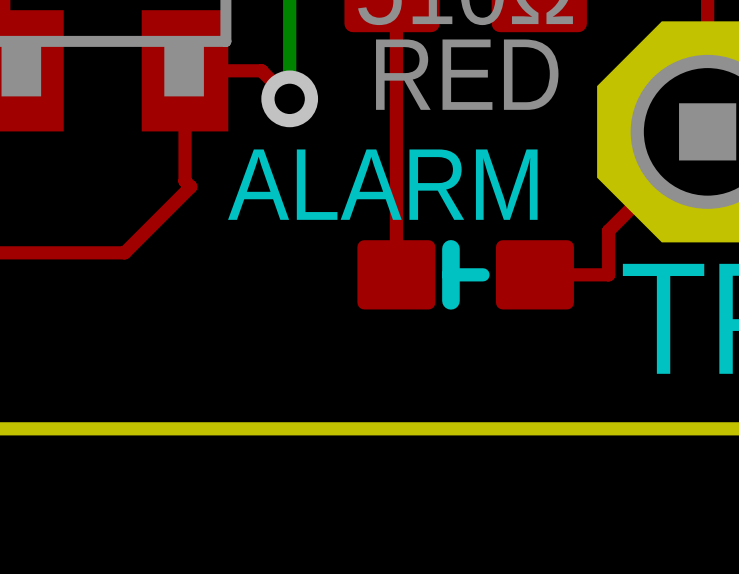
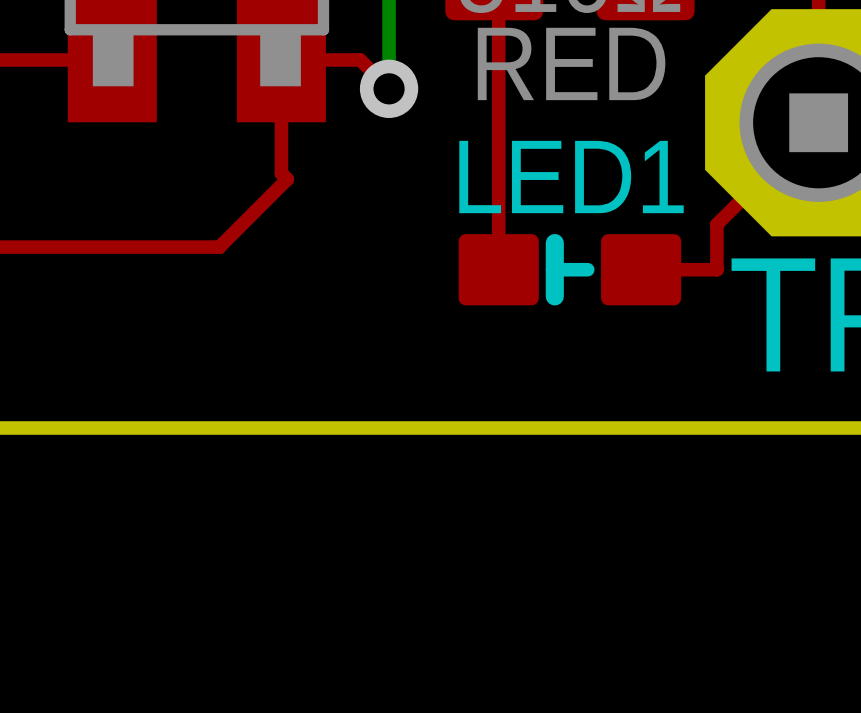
ALARM name: ALARM (382, 184) -> LED1 (571, 177)

